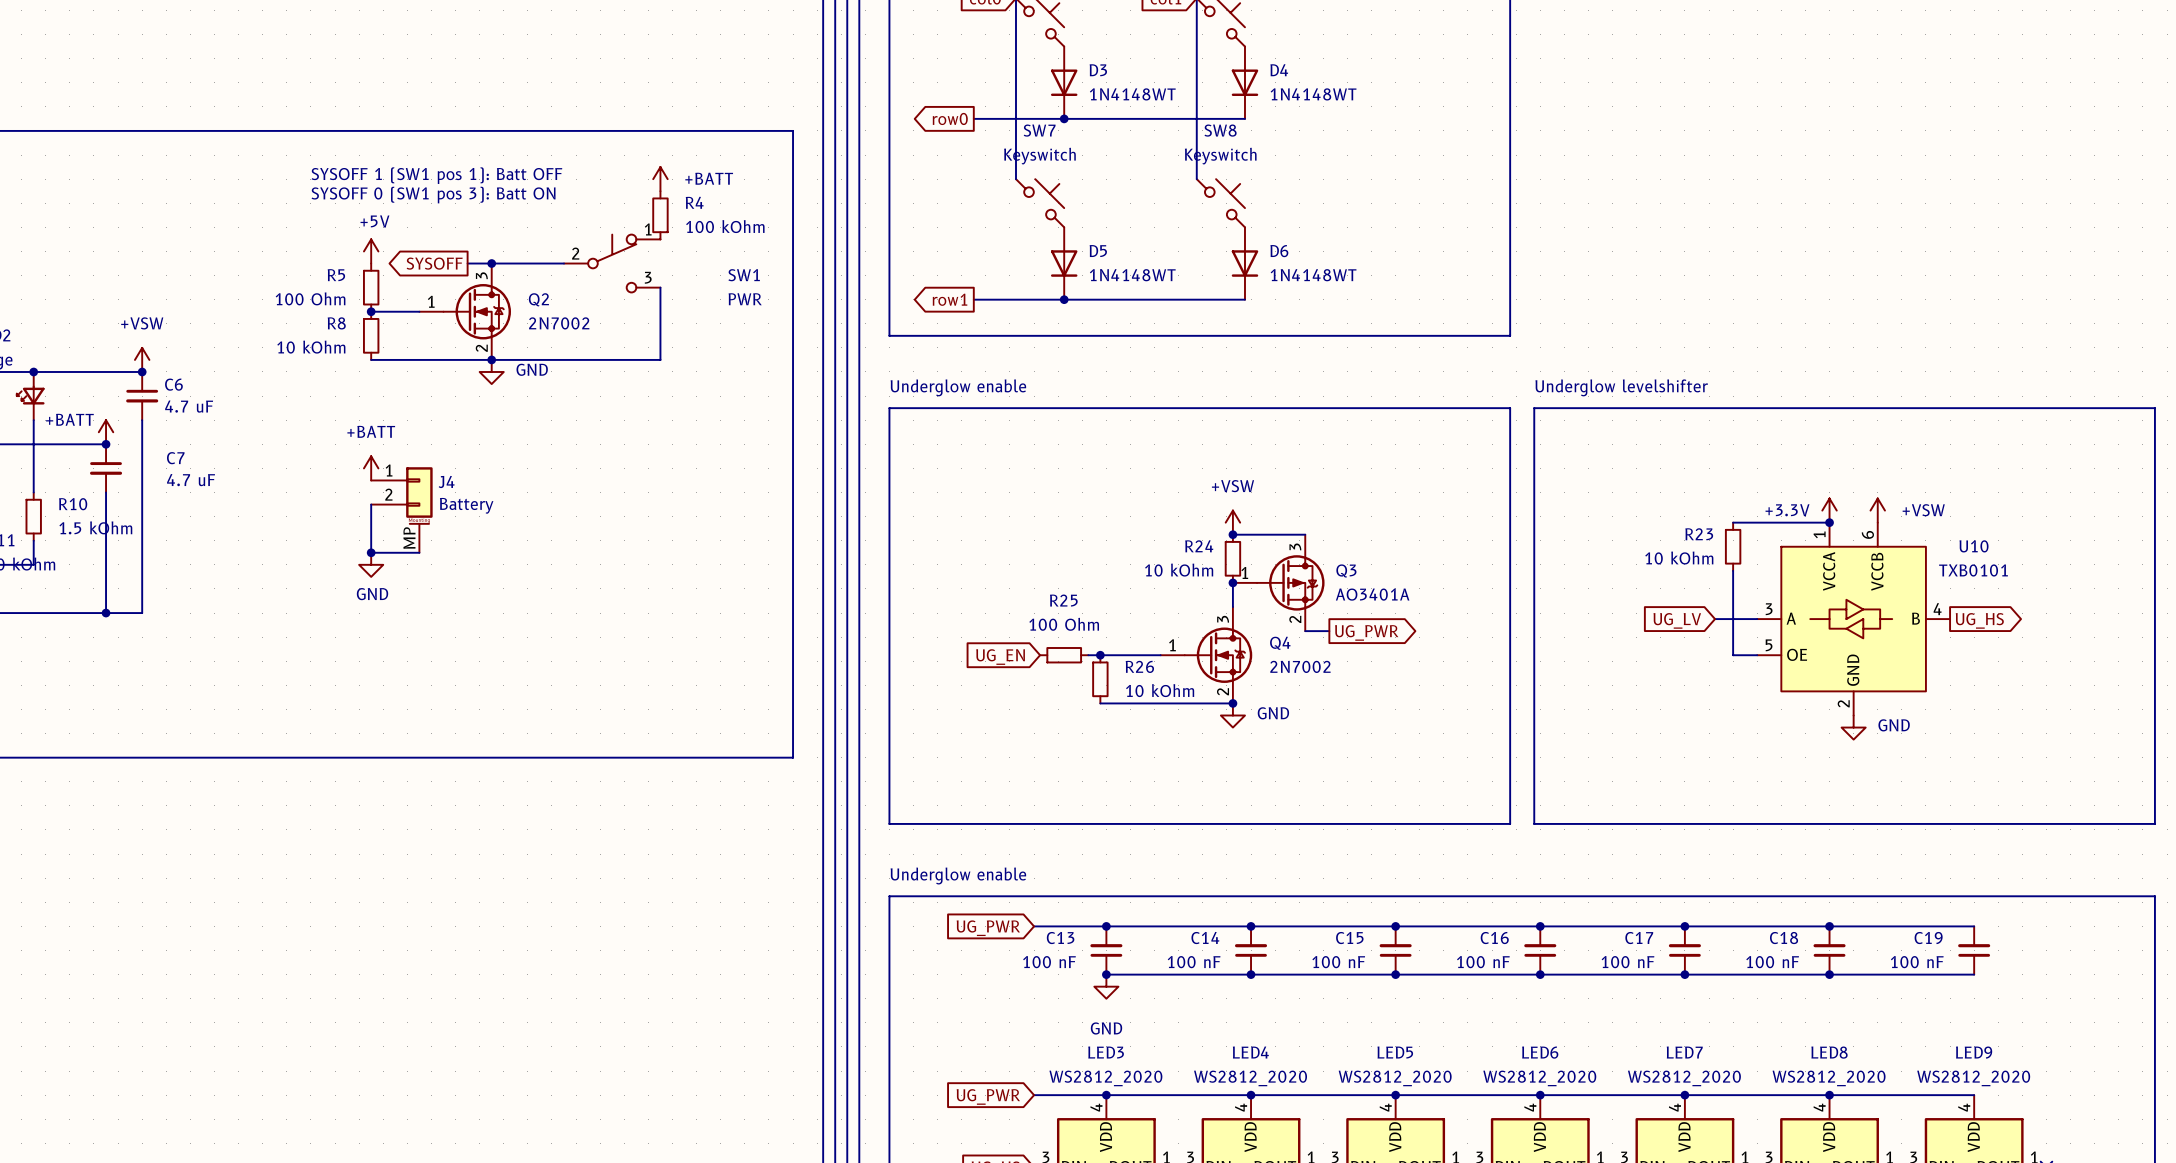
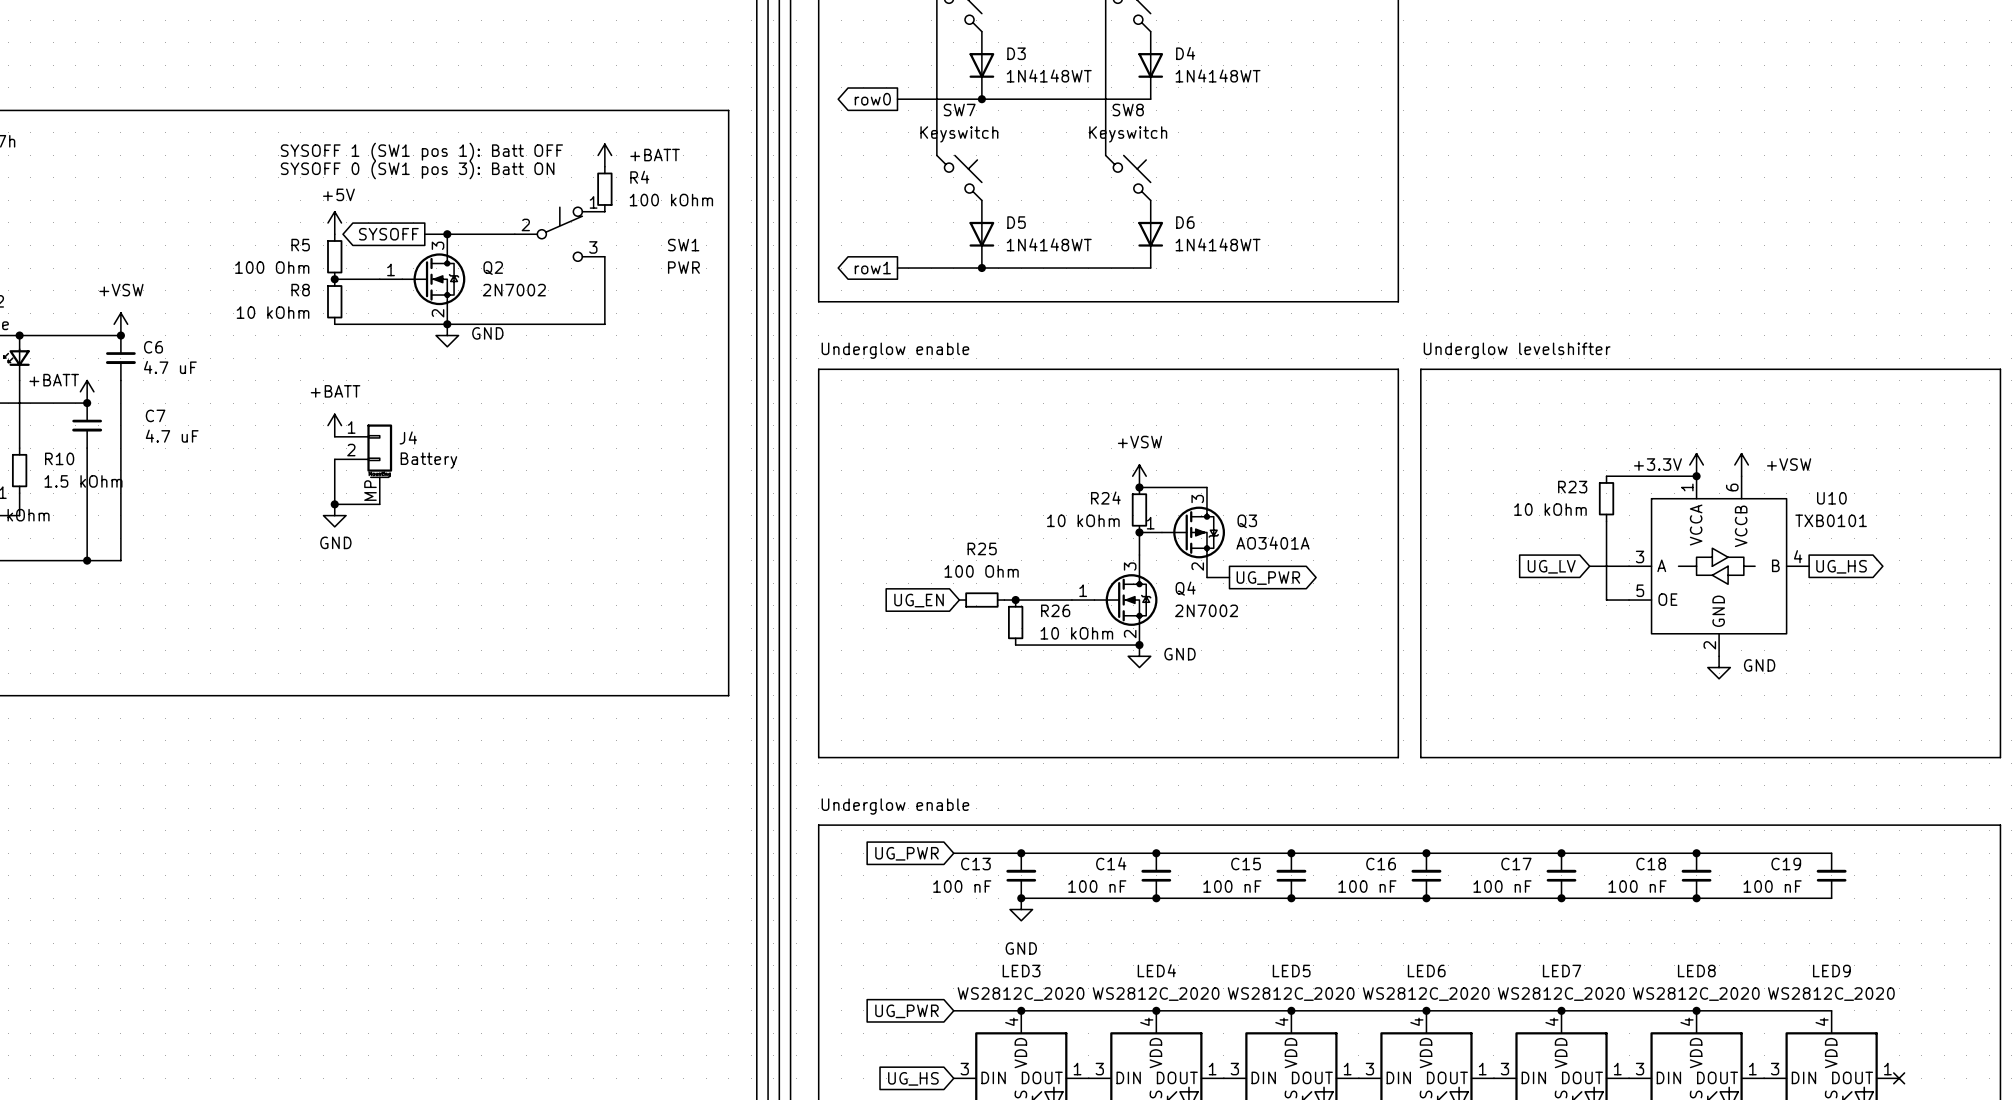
LED3 value: WS2812_2020 (1105, 1078) -> WS2812C_2020 (1021, 994)
LED4 value: WS2812_2020 (1250, 1078) -> WS2812C_2020 (1156, 994)
LED5 value: WS2812_2020 (1395, 1078) -> WS2812C_2020 (1291, 994)
LED6 value: WS2812_2020 (1539, 1078) -> WS2812C_2020 (1426, 994)
LED7 value: WS2812_2020 (1684, 1078) -> WS2812C_2020 (1561, 994)
LED8 value: WS2812_2020 (1829, 1078) -> WS2812C_2020 (1696, 994)
LED9 value: WS2812_2020 (1973, 1078) -> WS2812C_2020 (1831, 994)

